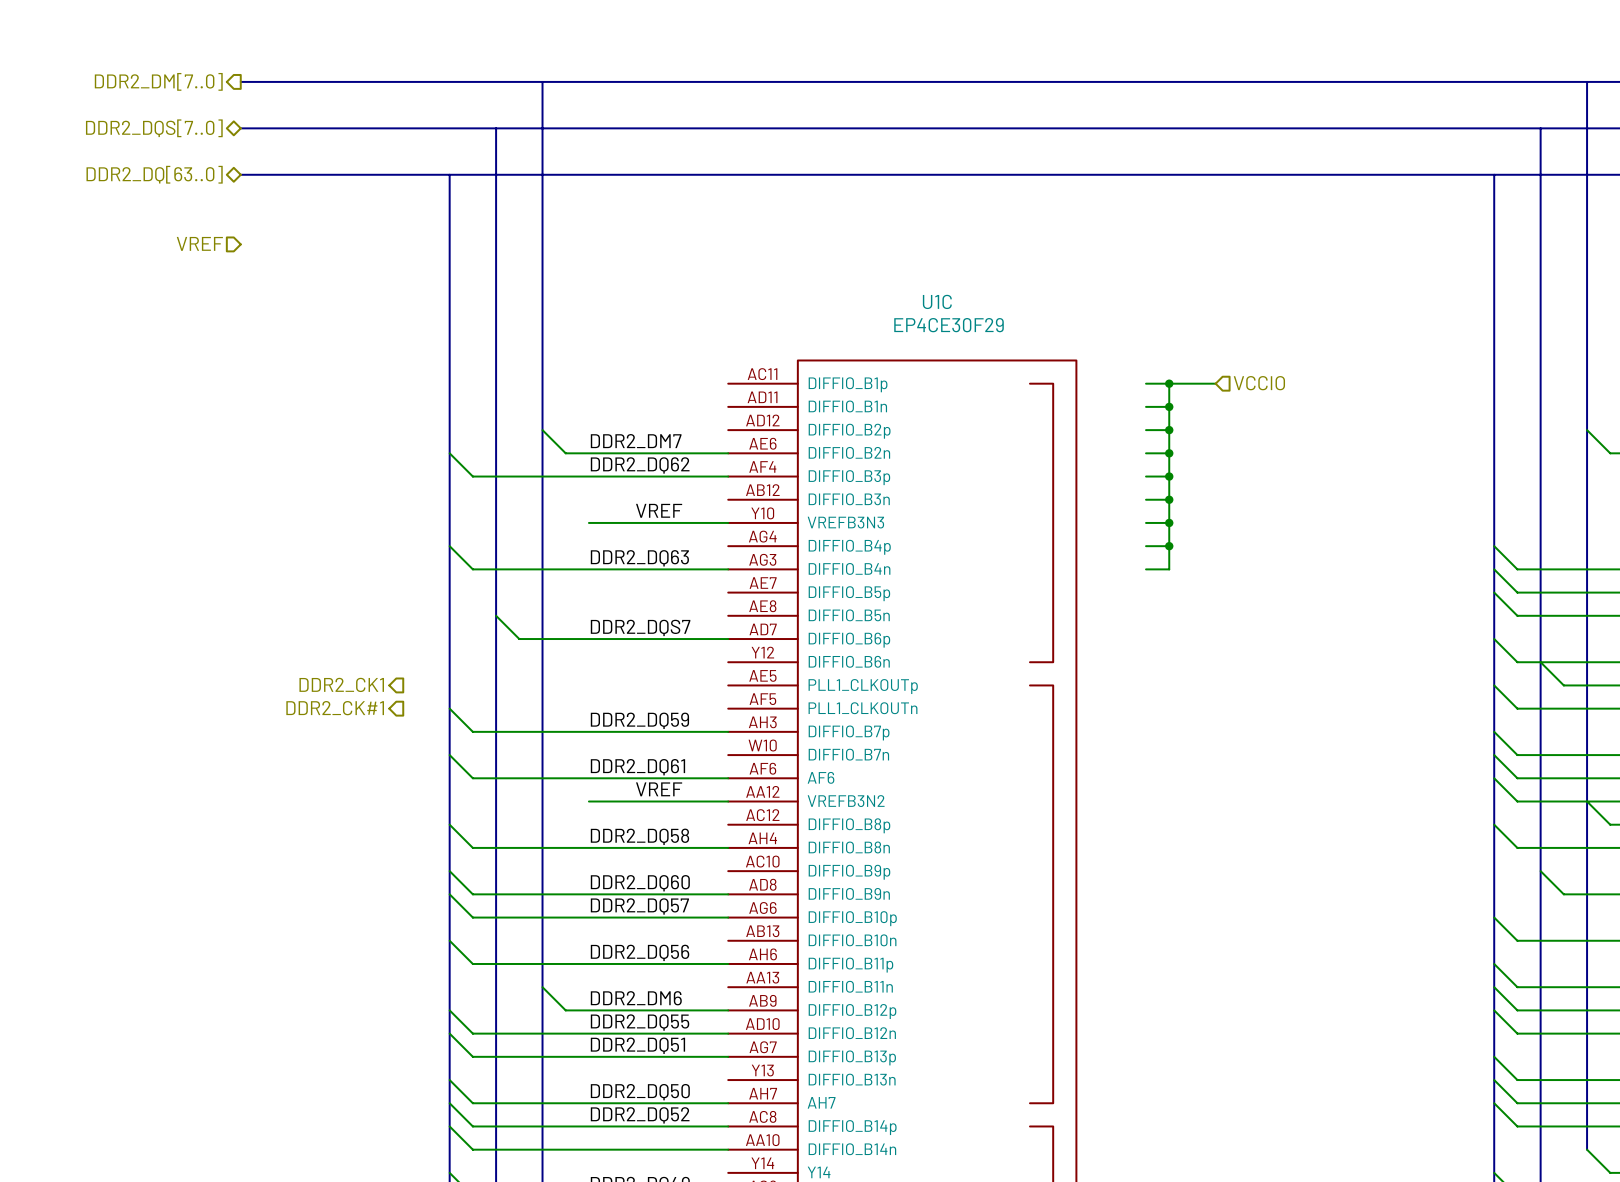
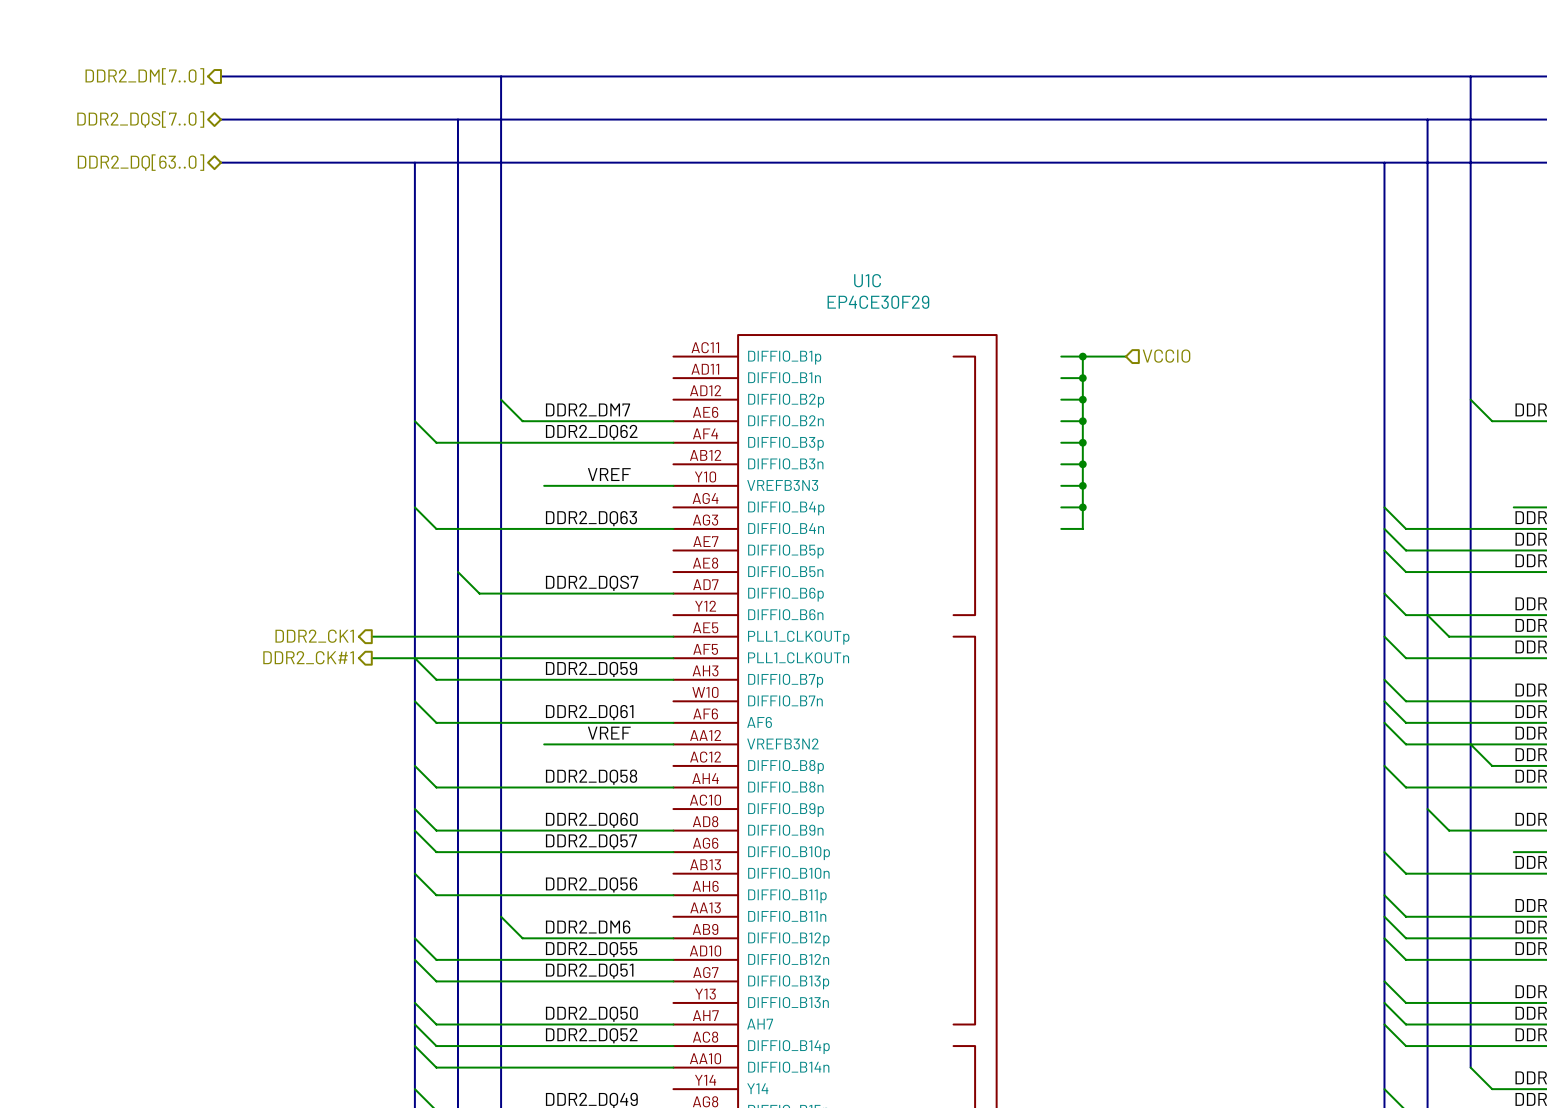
hierarchical label: VREF (199, 243) -> none
wire: none -> (371, 636) (673, 636)
wire: none -> (371, 658) (673, 658)

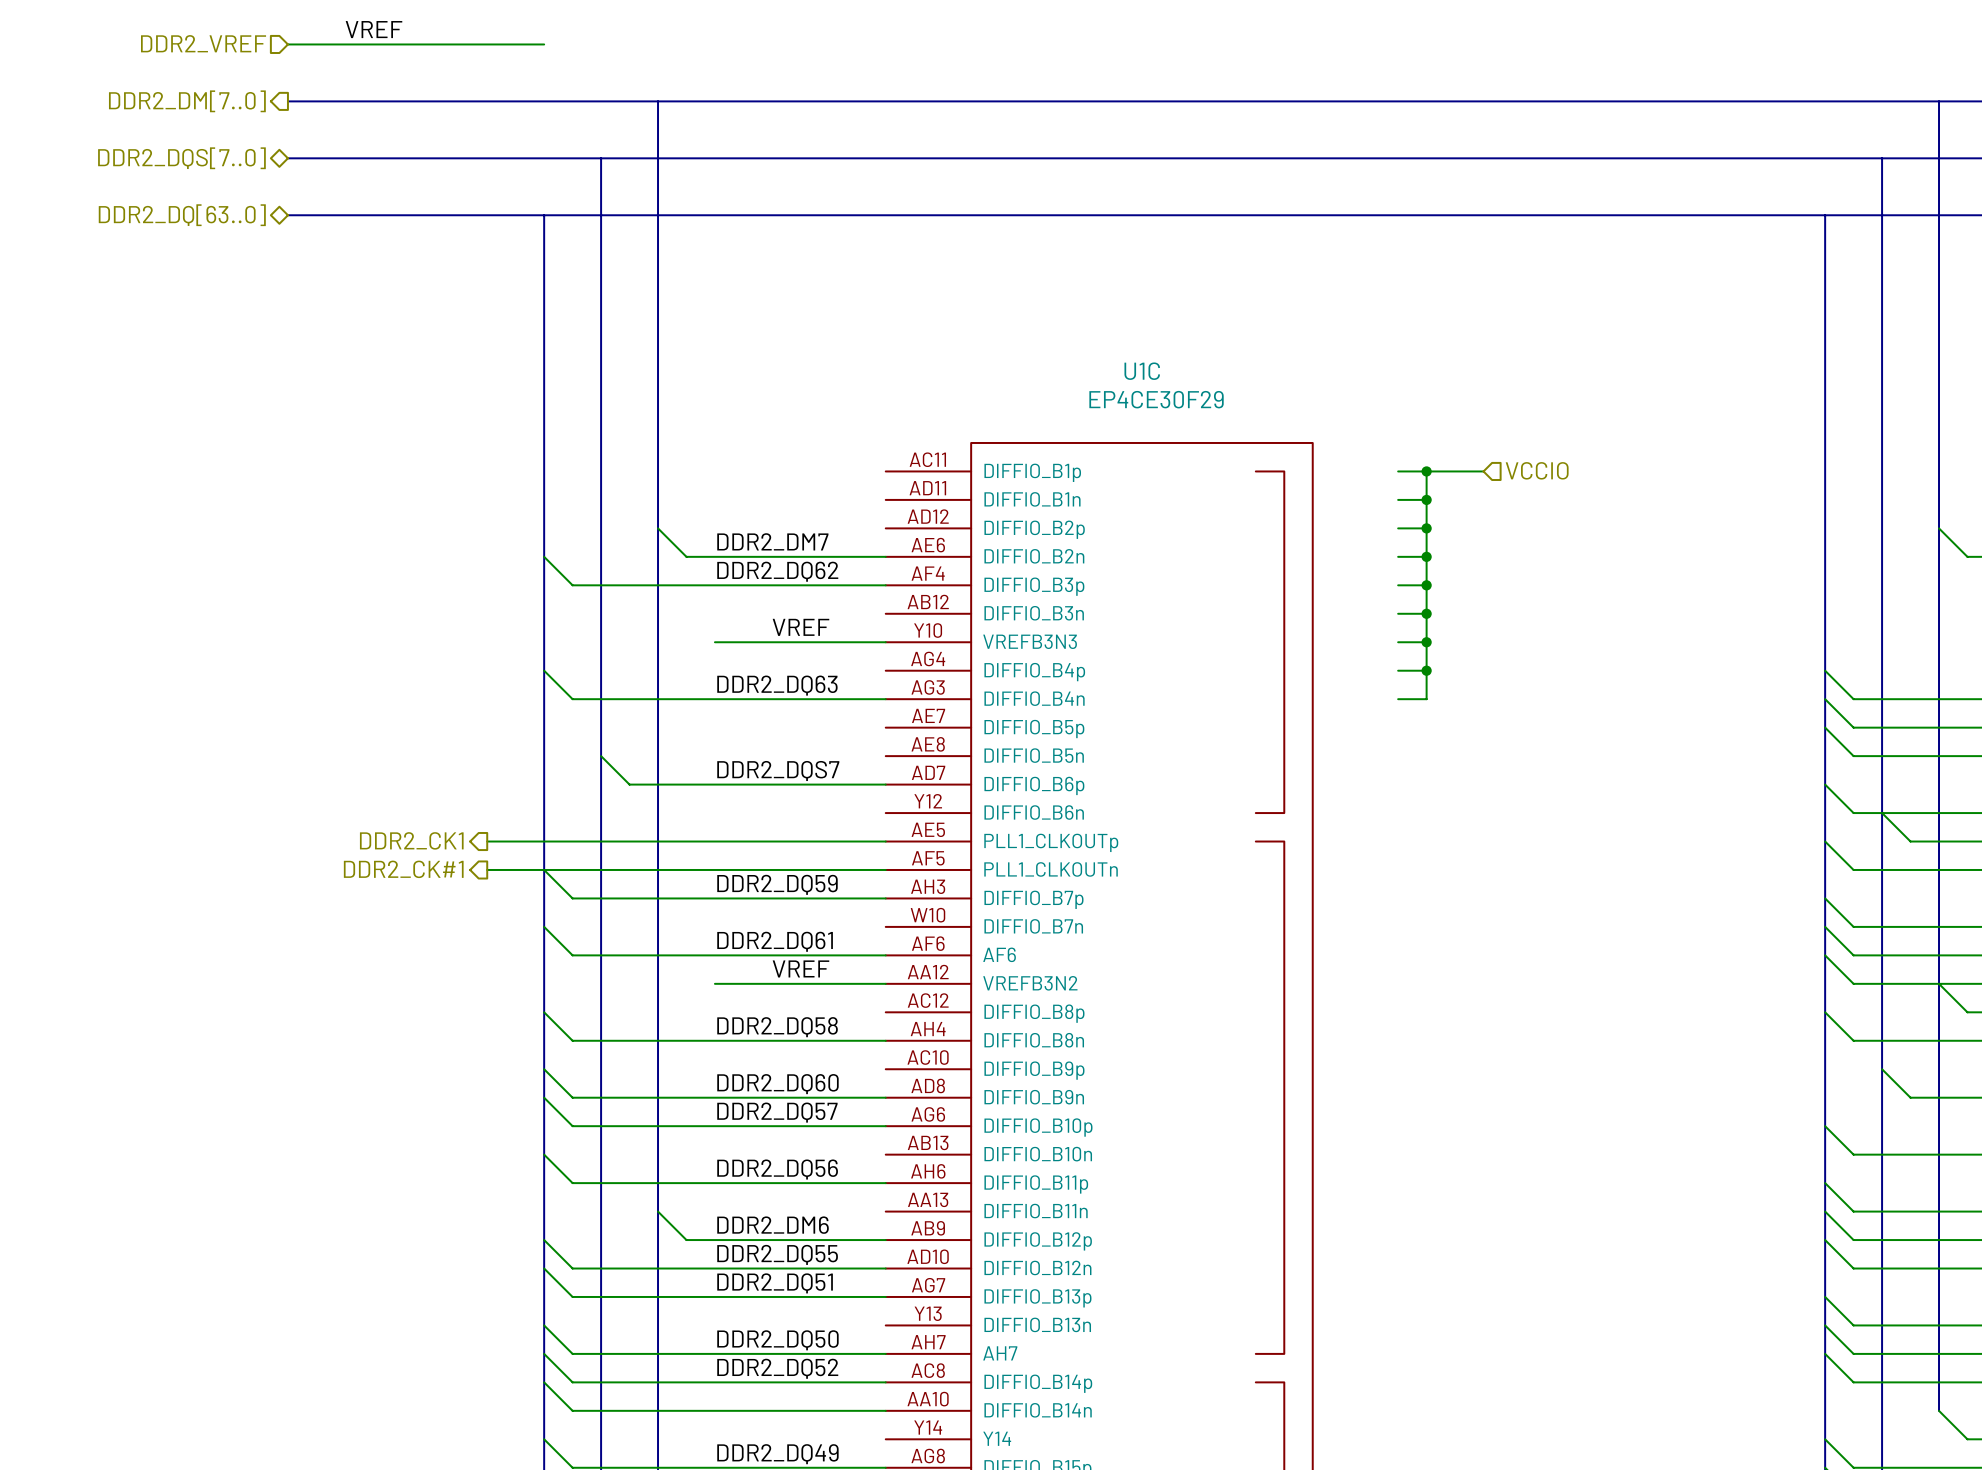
label: none -> VREF (374, 29)
hierarchical label: none -> DDR2_VREF (203, 43)
wire: none -> (287, 44) (544, 44)

